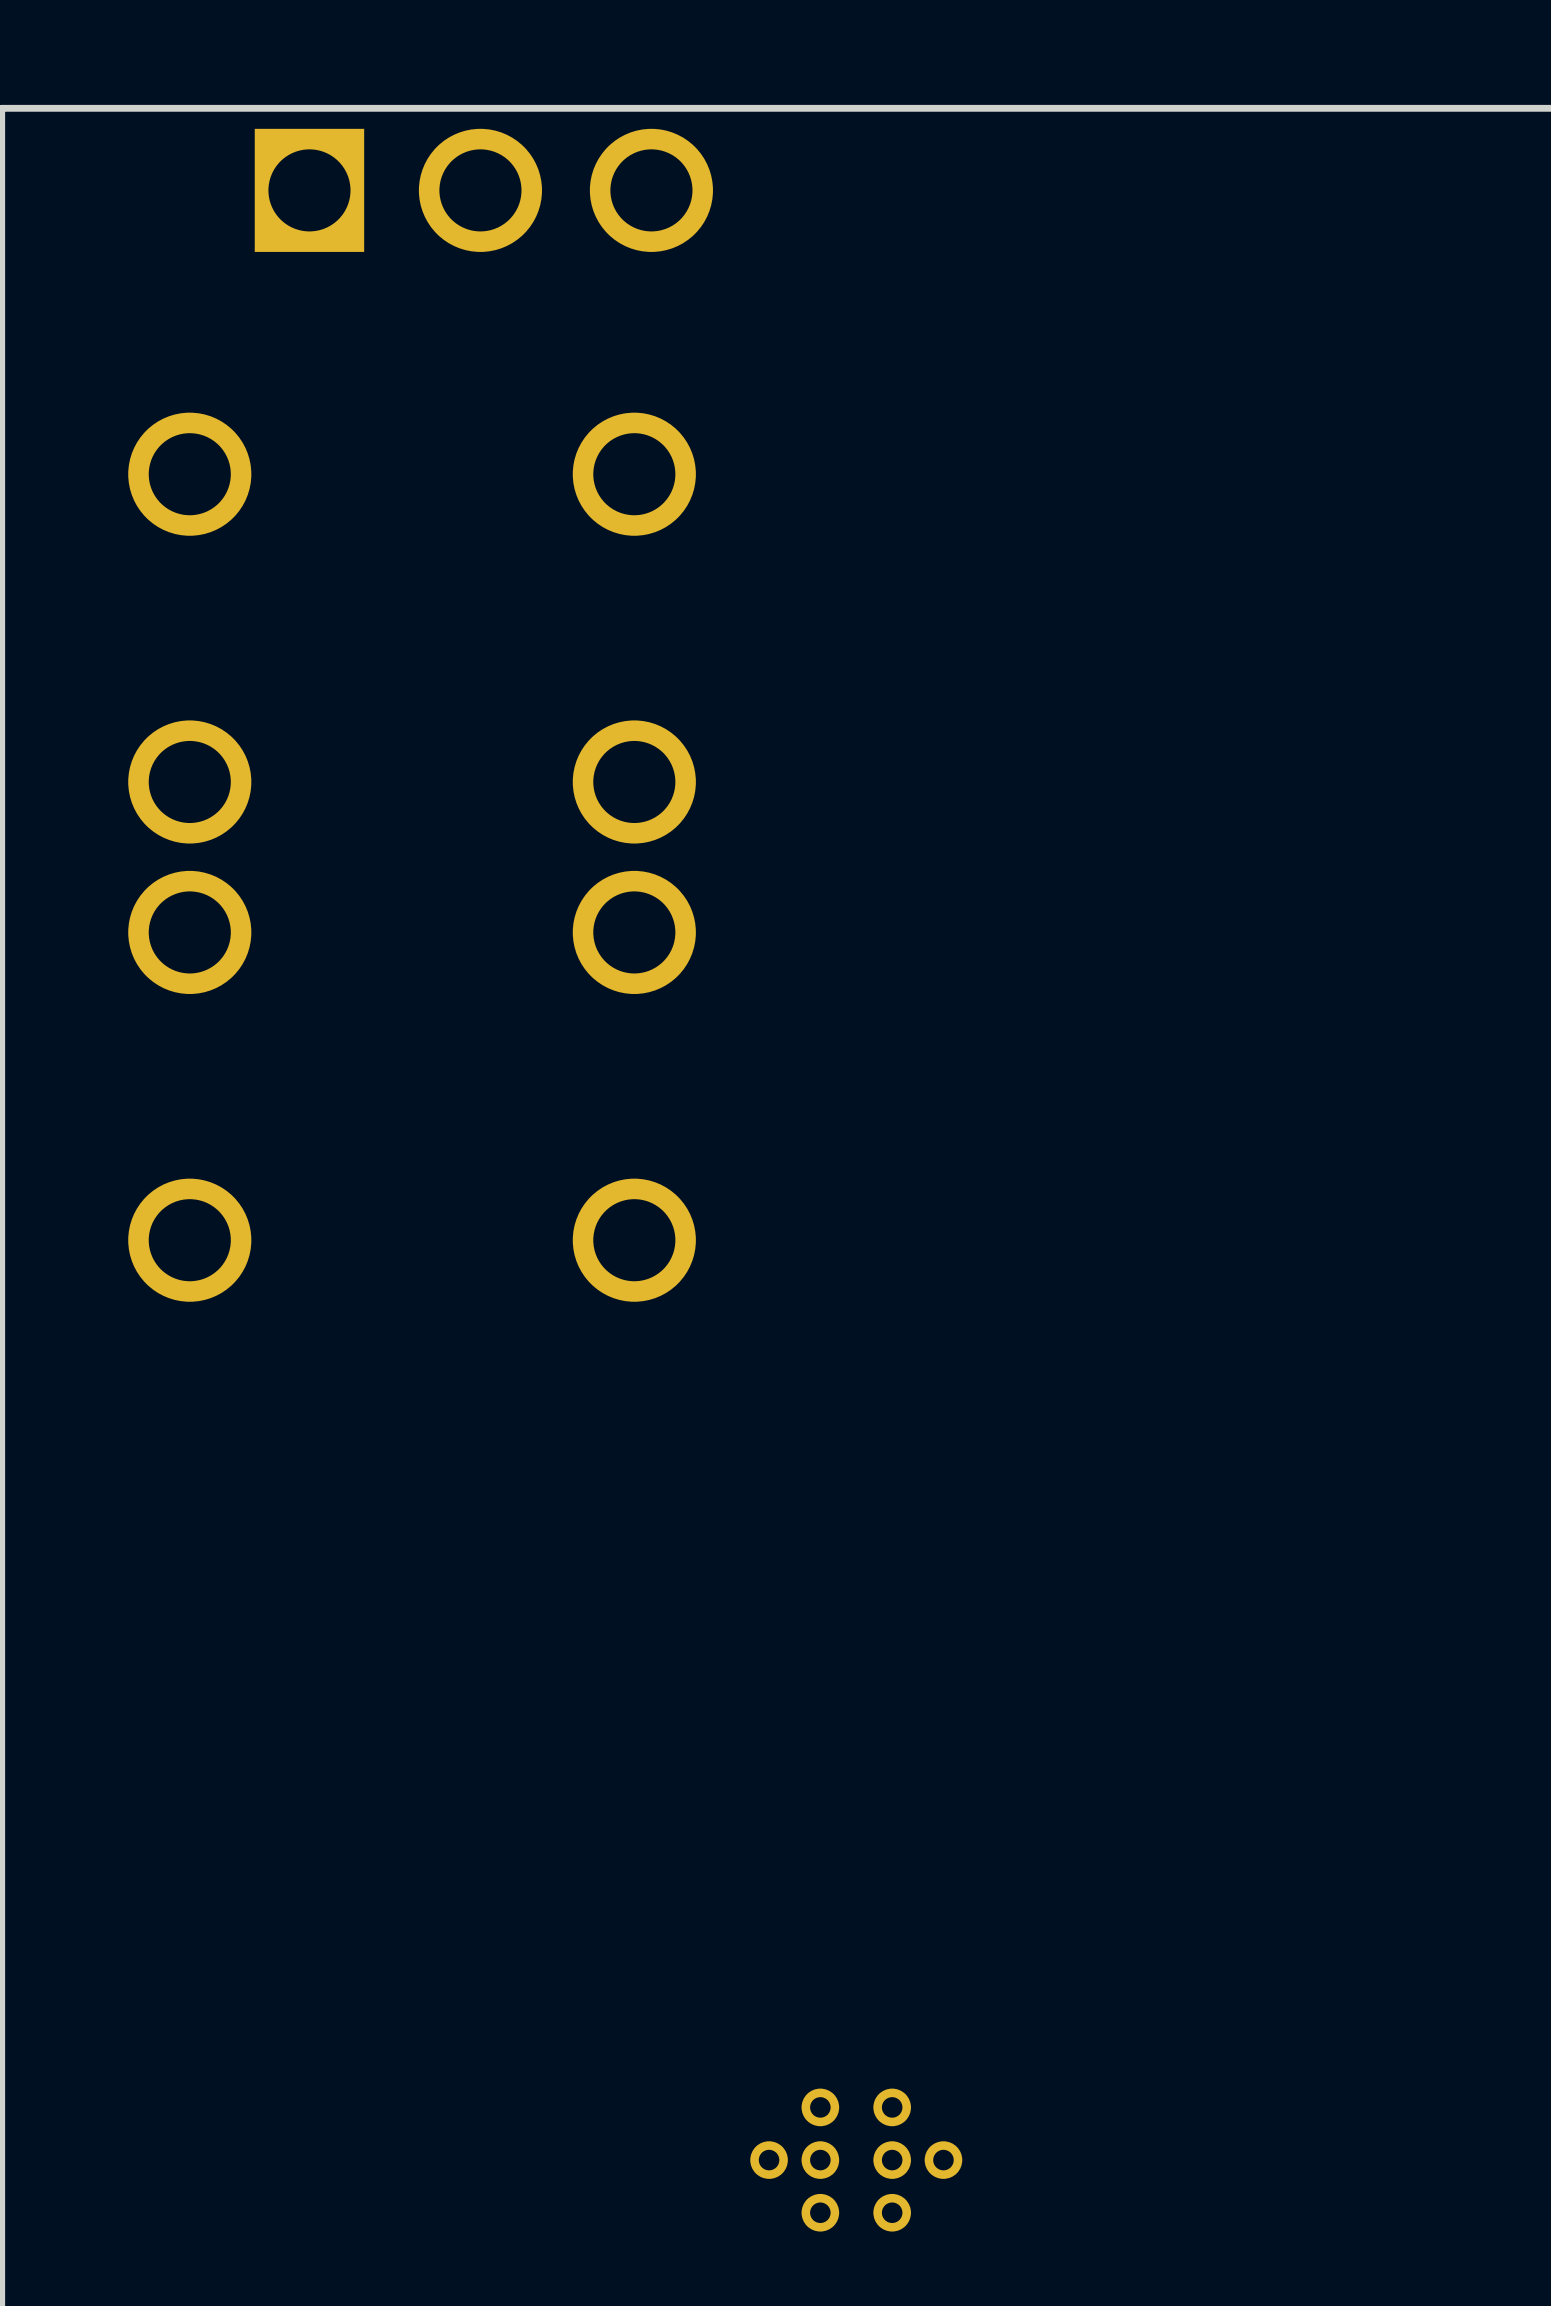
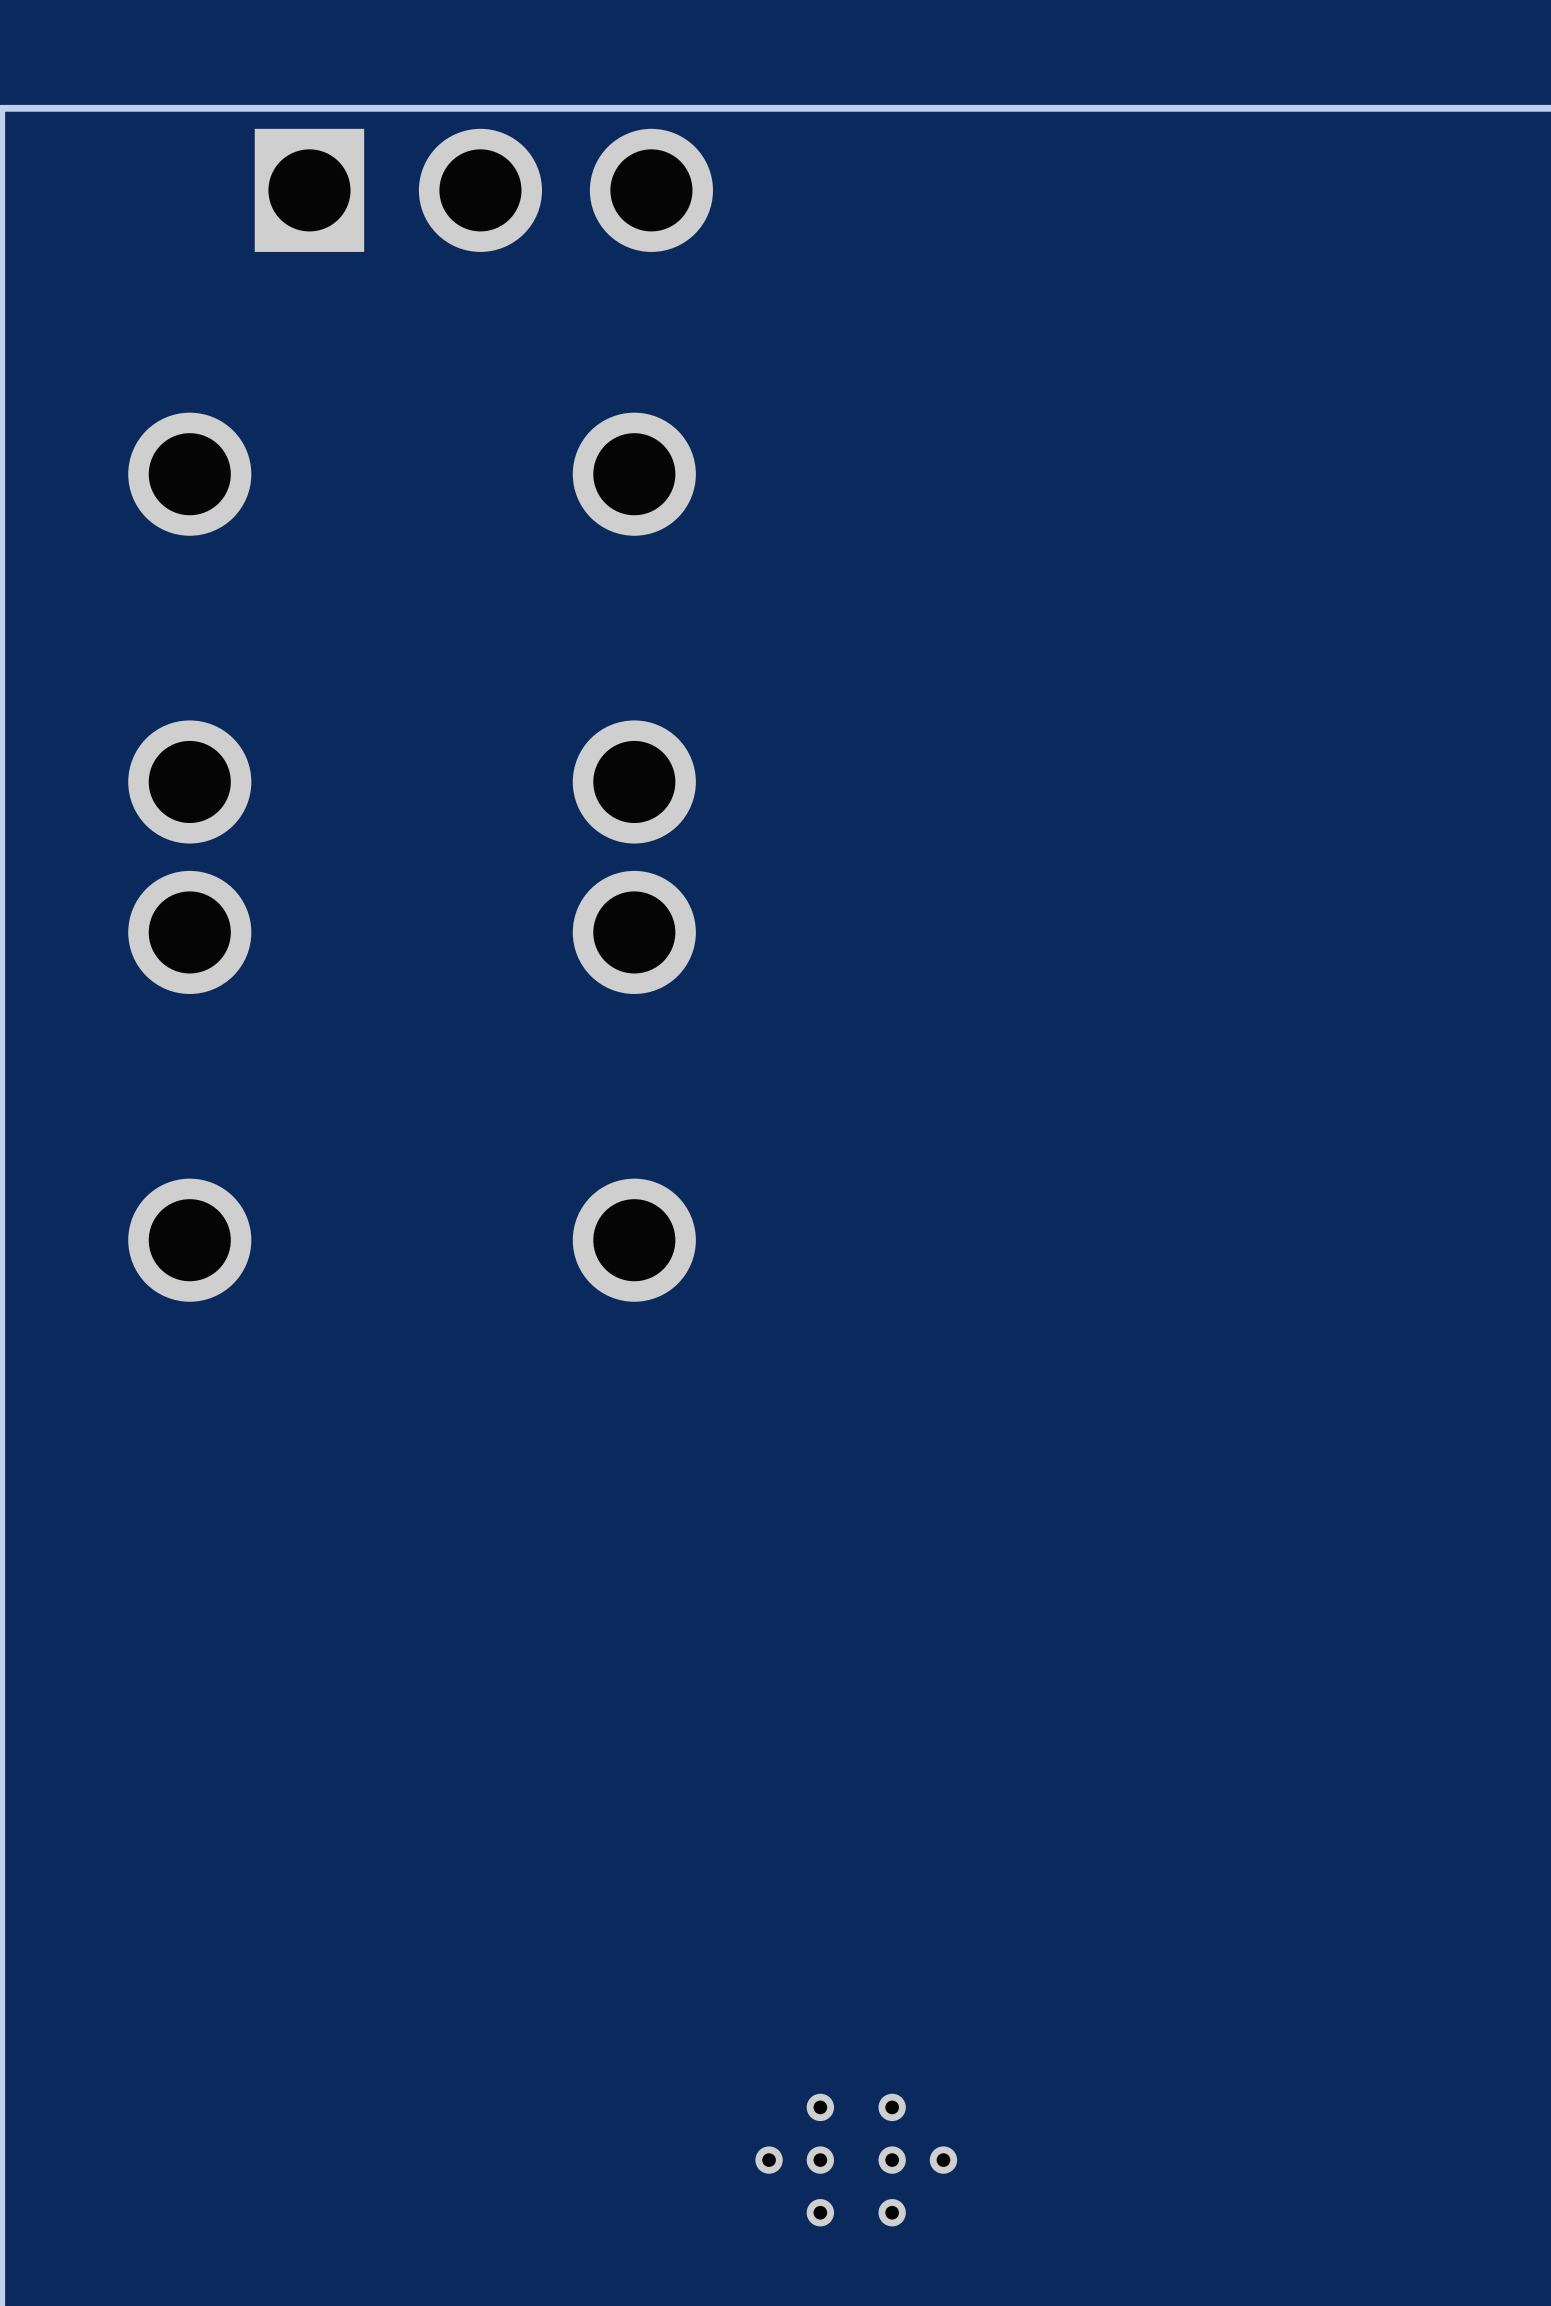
part footprint: [750, 2088, 963, 2232] -> [755, 2093, 958, 2227]

